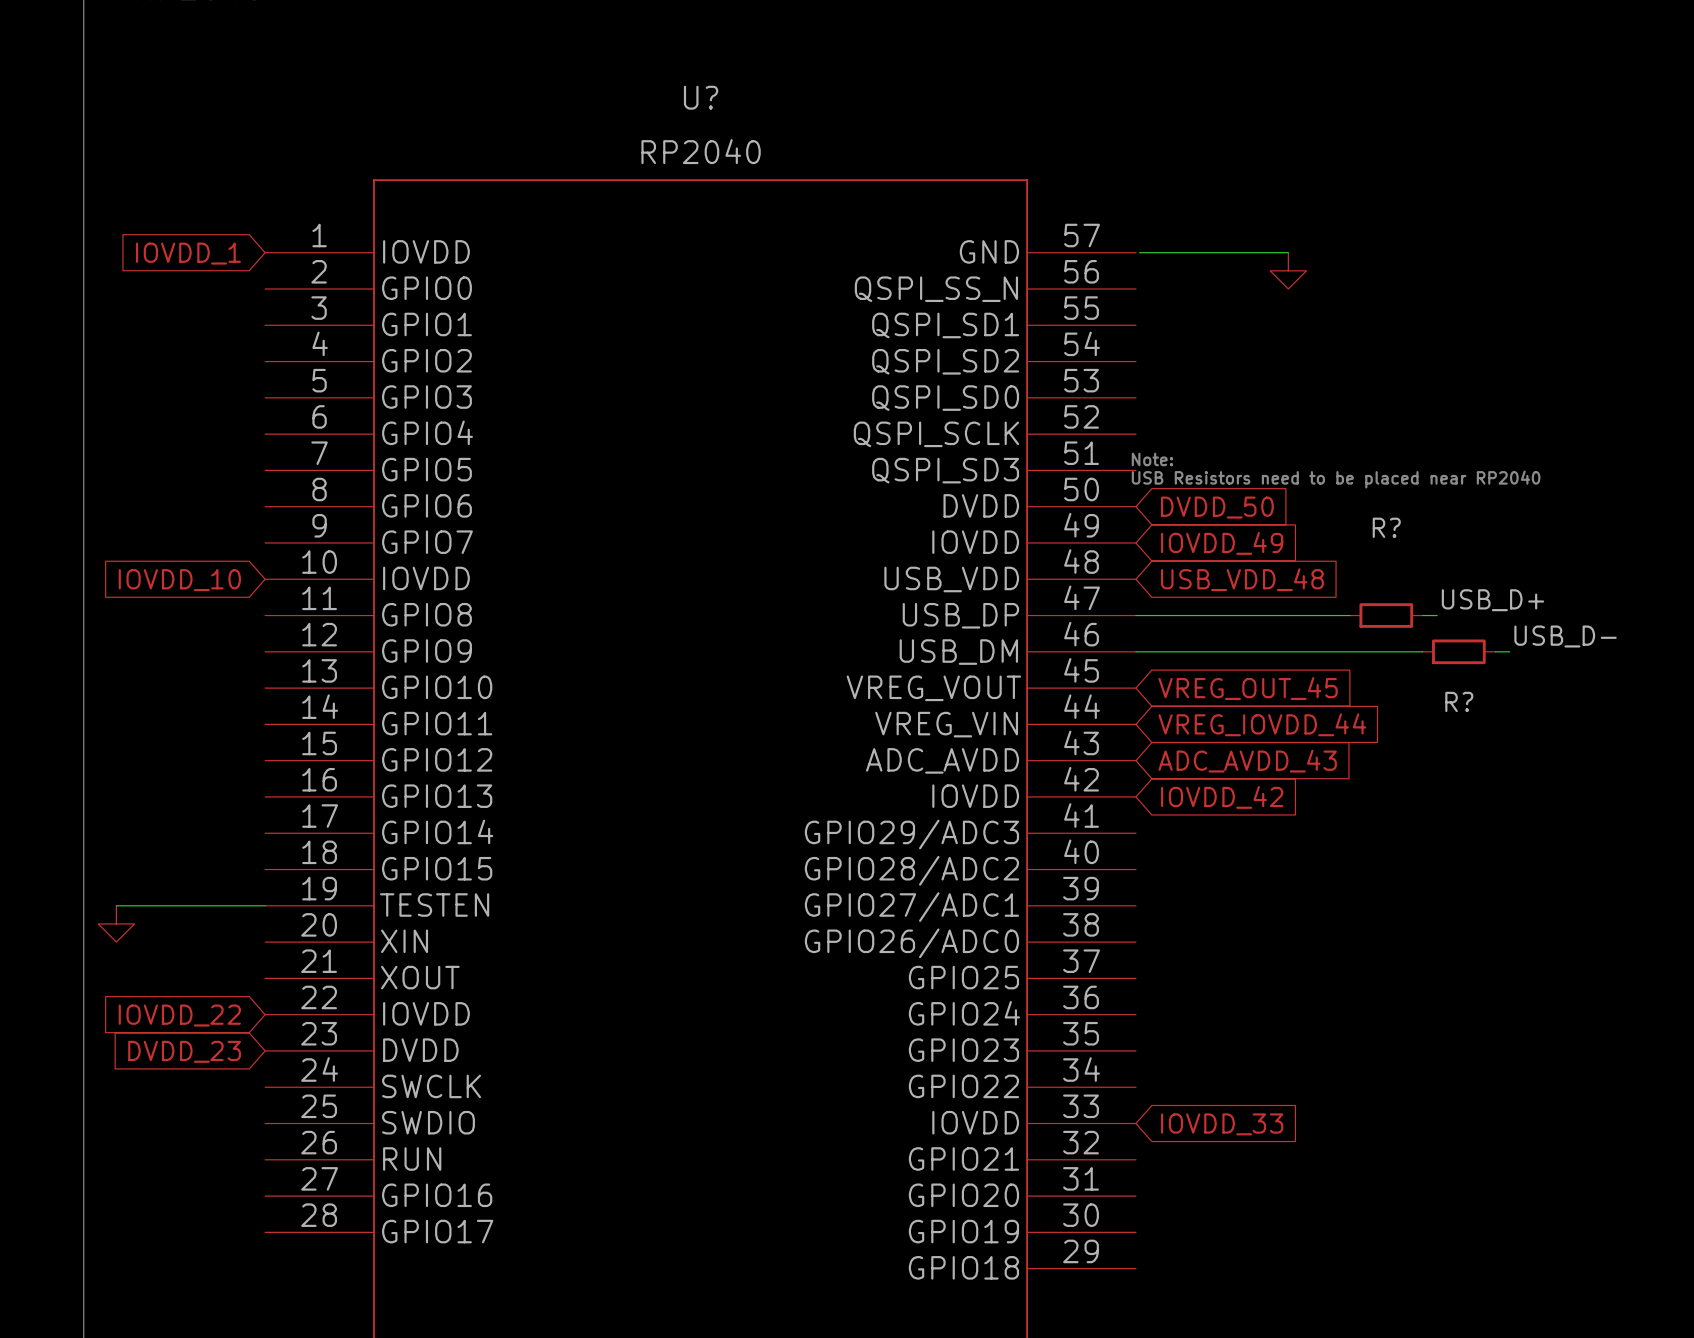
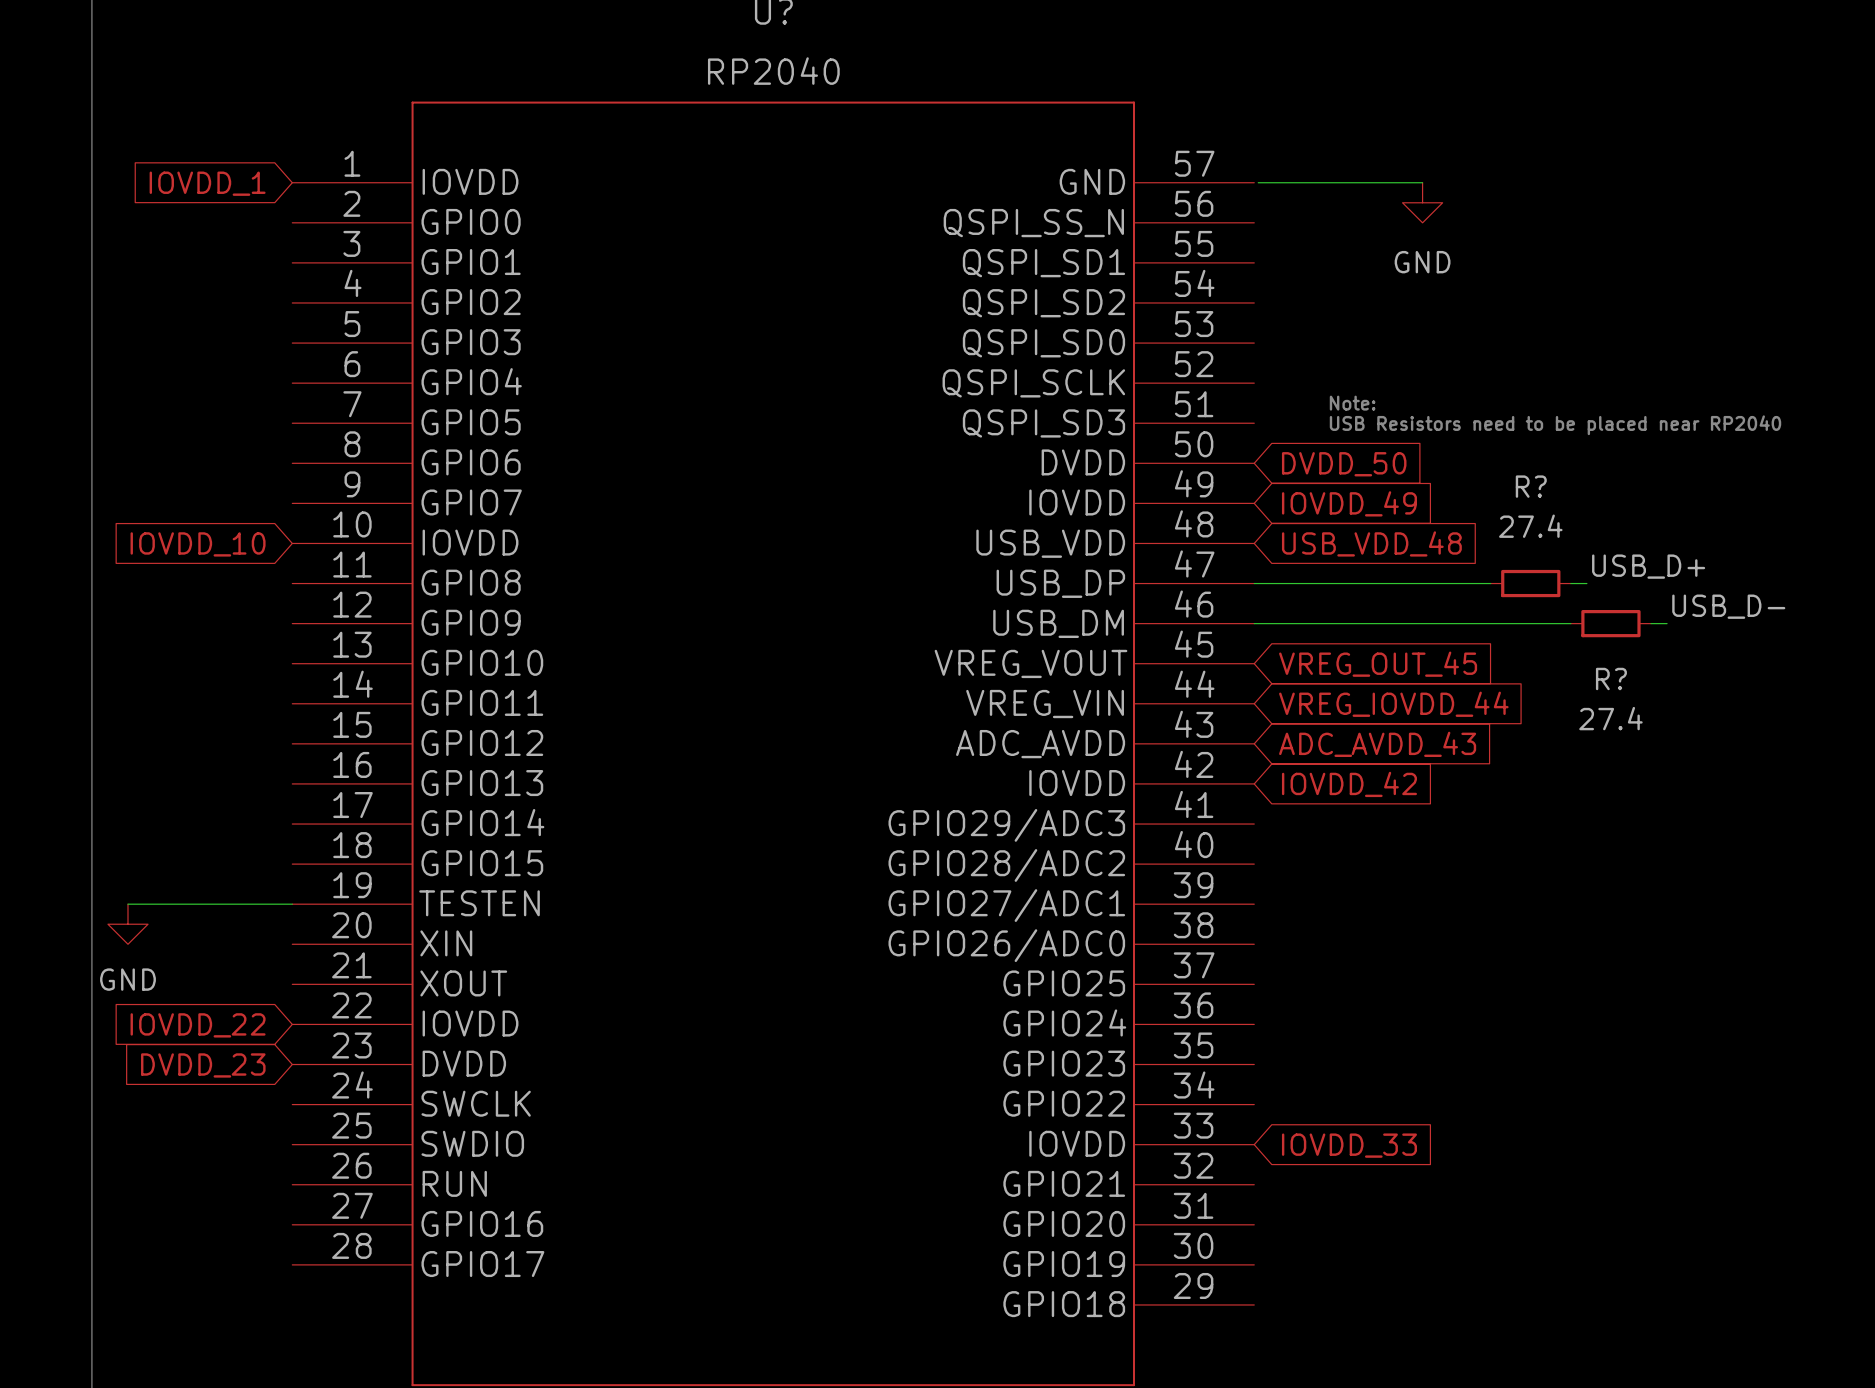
power symbol text: none -> GND (1422, 262)
text position: Note: (1152, 459) -> Note: (1352, 403)
text position: USB Resistors need to be placed near RP2040 (1336, 479) -> USB Resistors need to be placed near RP2040 (1555, 425)
R? value: none -> 27.4 (1530, 526)
R? value: none -> 27.4 (1610, 718)
power symbol text: none -> GND (127, 979)

